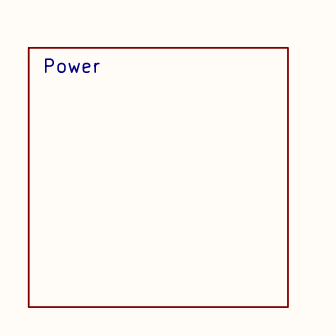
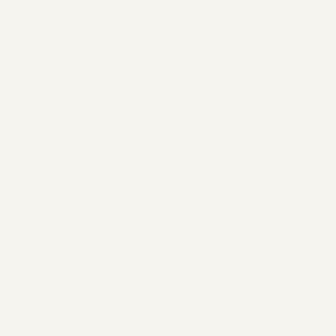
sheet Power: (158, 177) -> none

